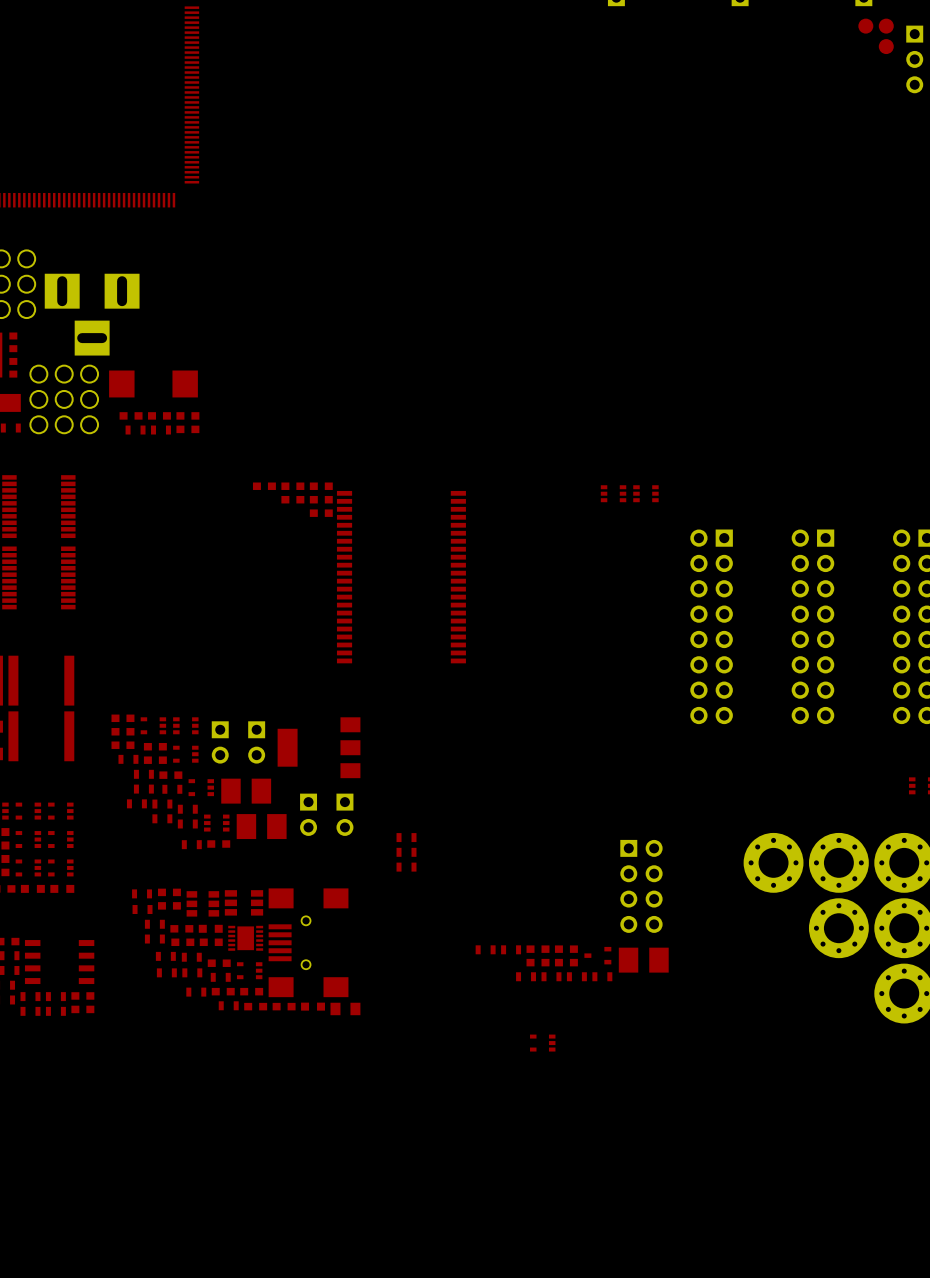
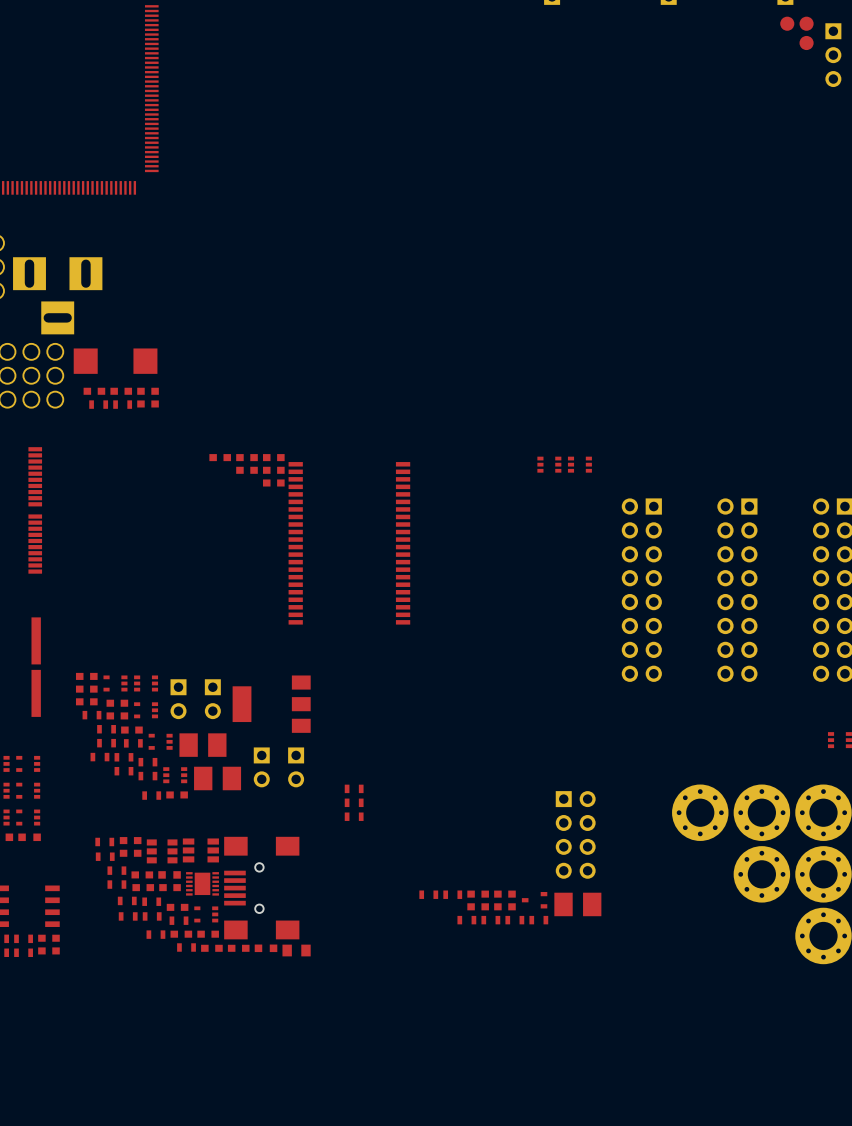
part: (542, 1043) -> none

